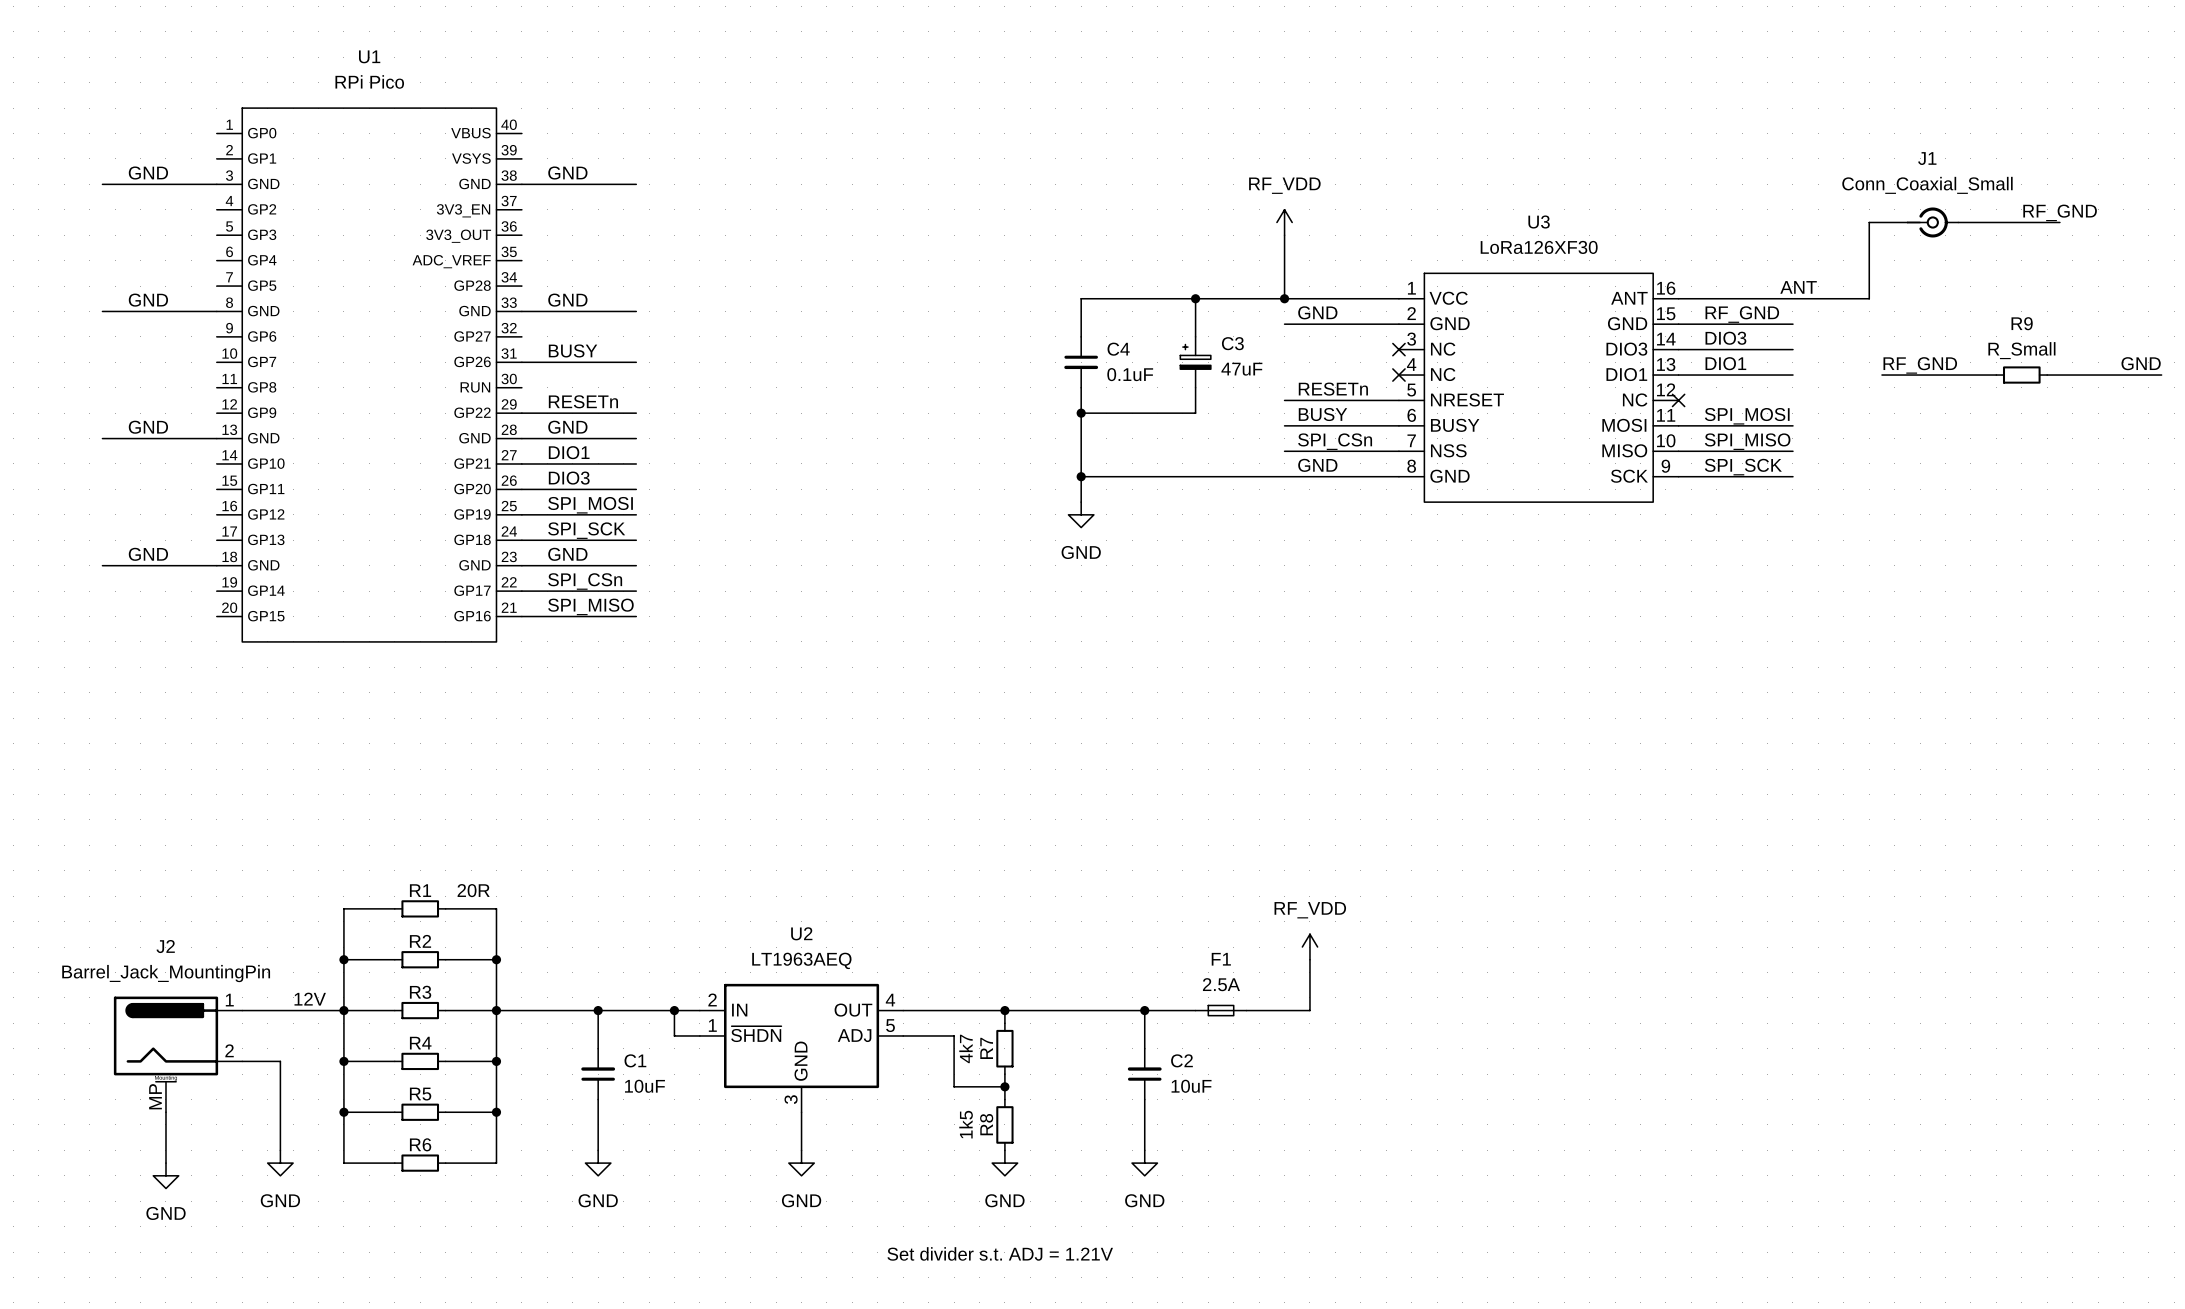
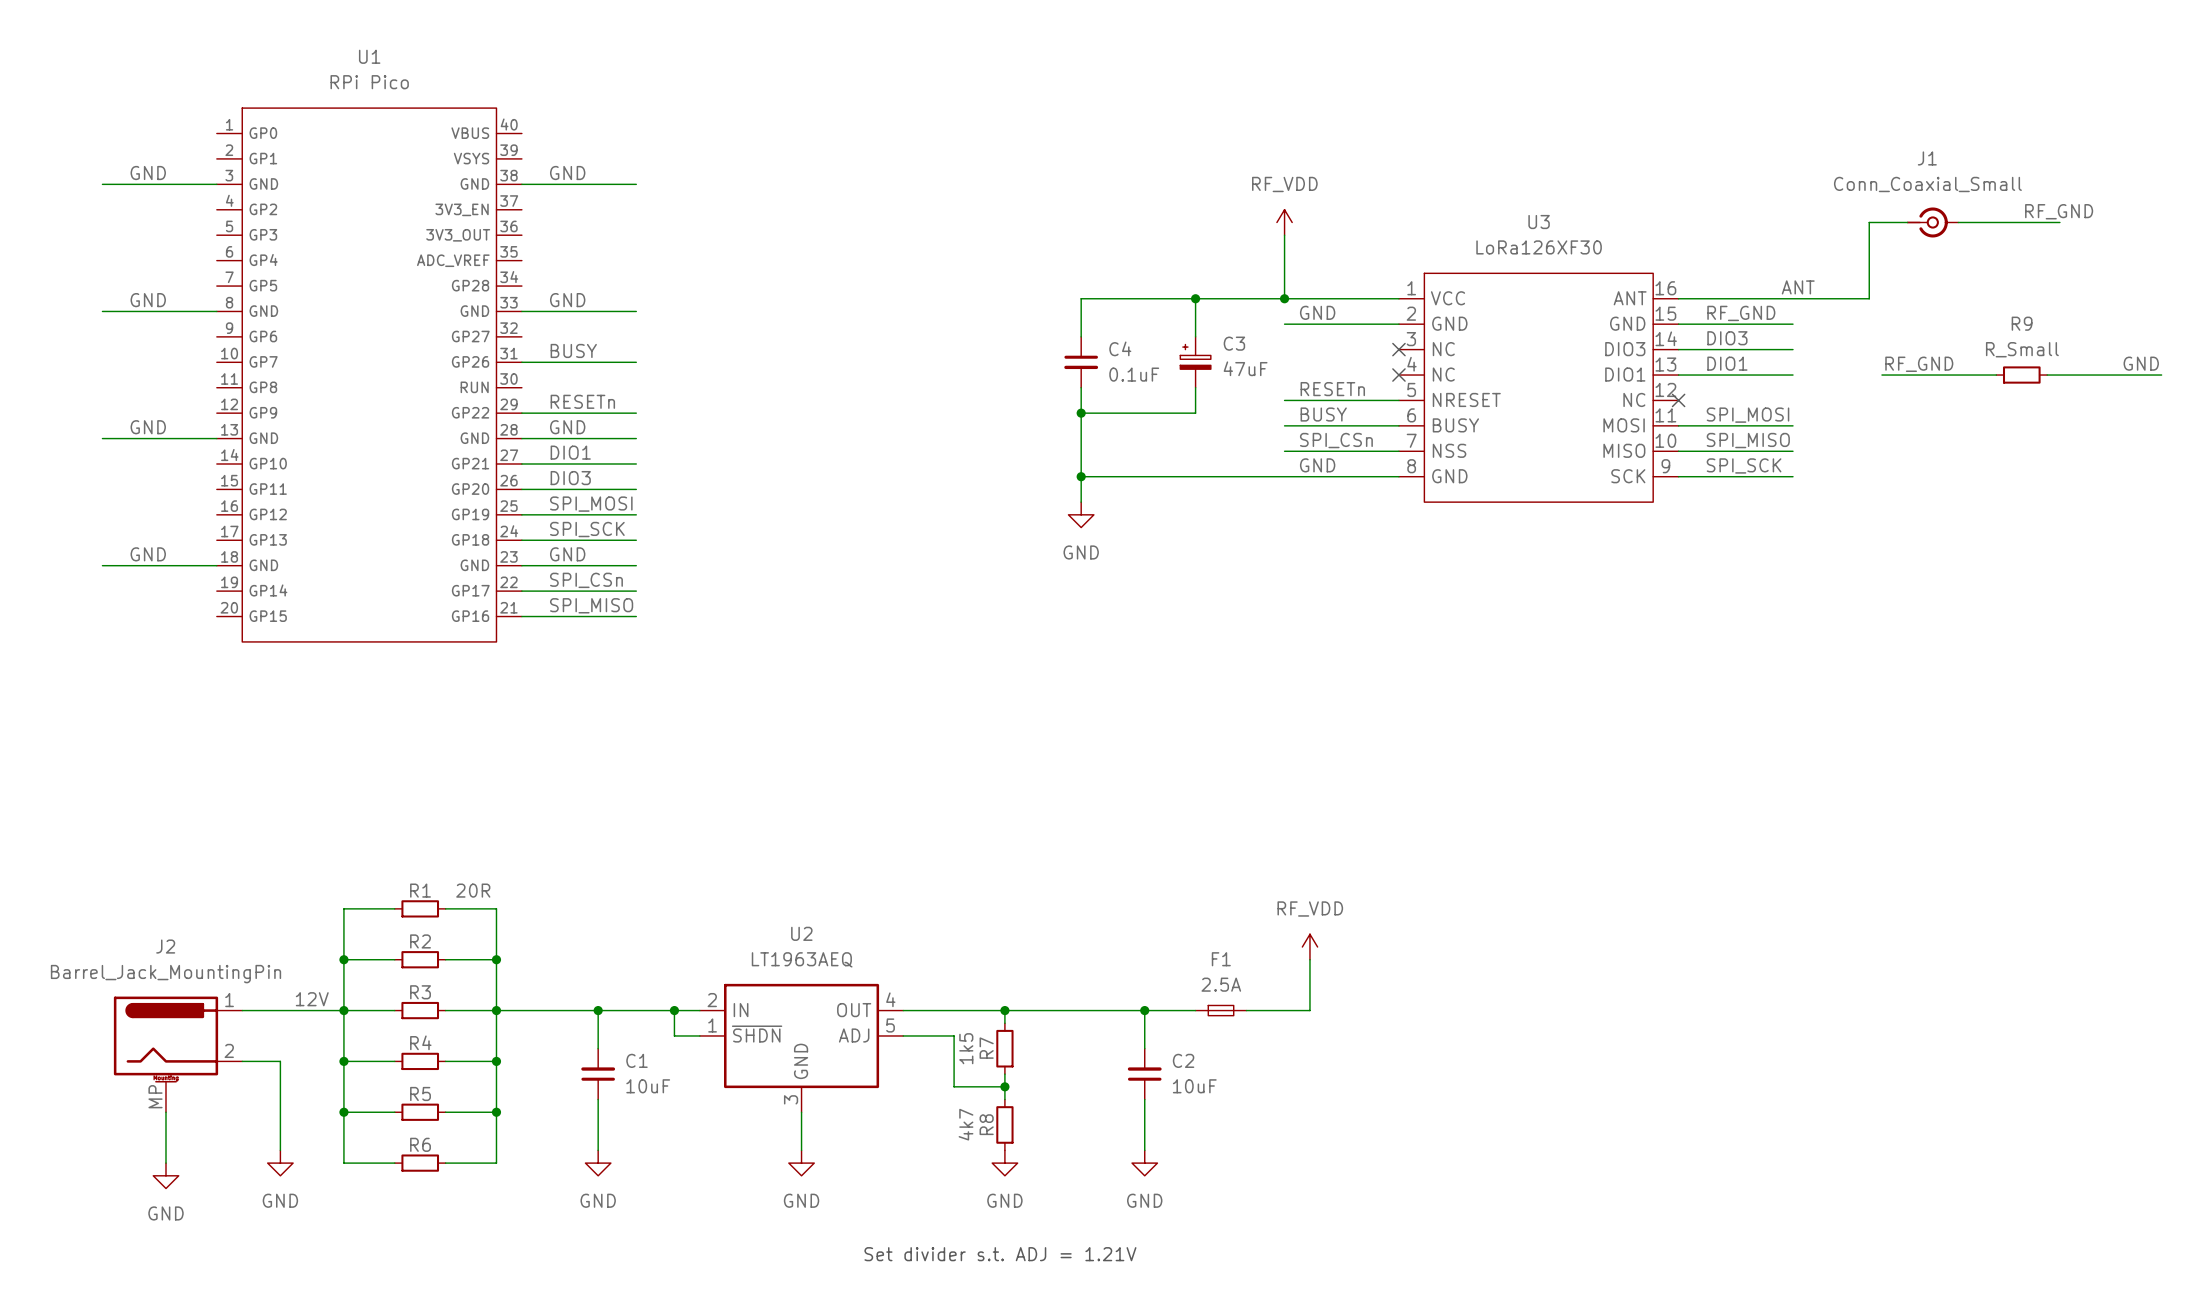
R7 value: 4k7 (965, 1048) -> 1k5 (966, 1048)
R8 value: 1k5 (966, 1124) -> 4k7 (966, 1124)

